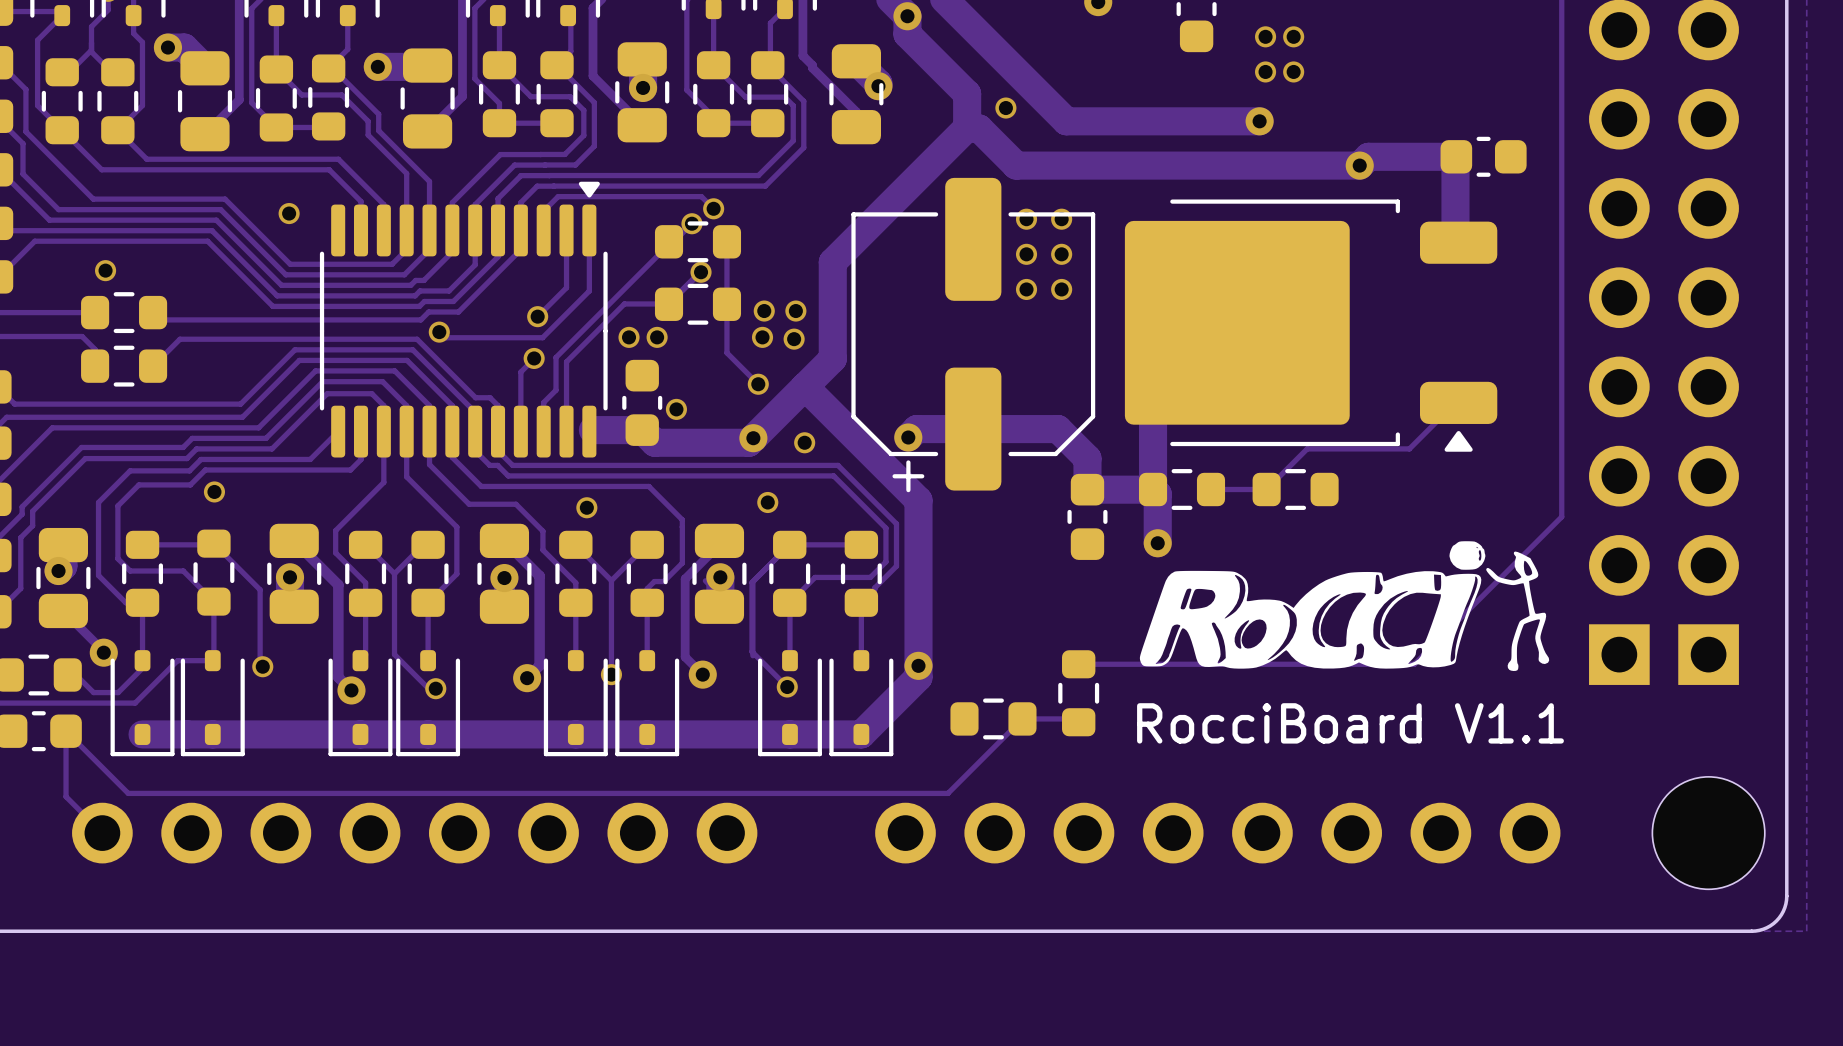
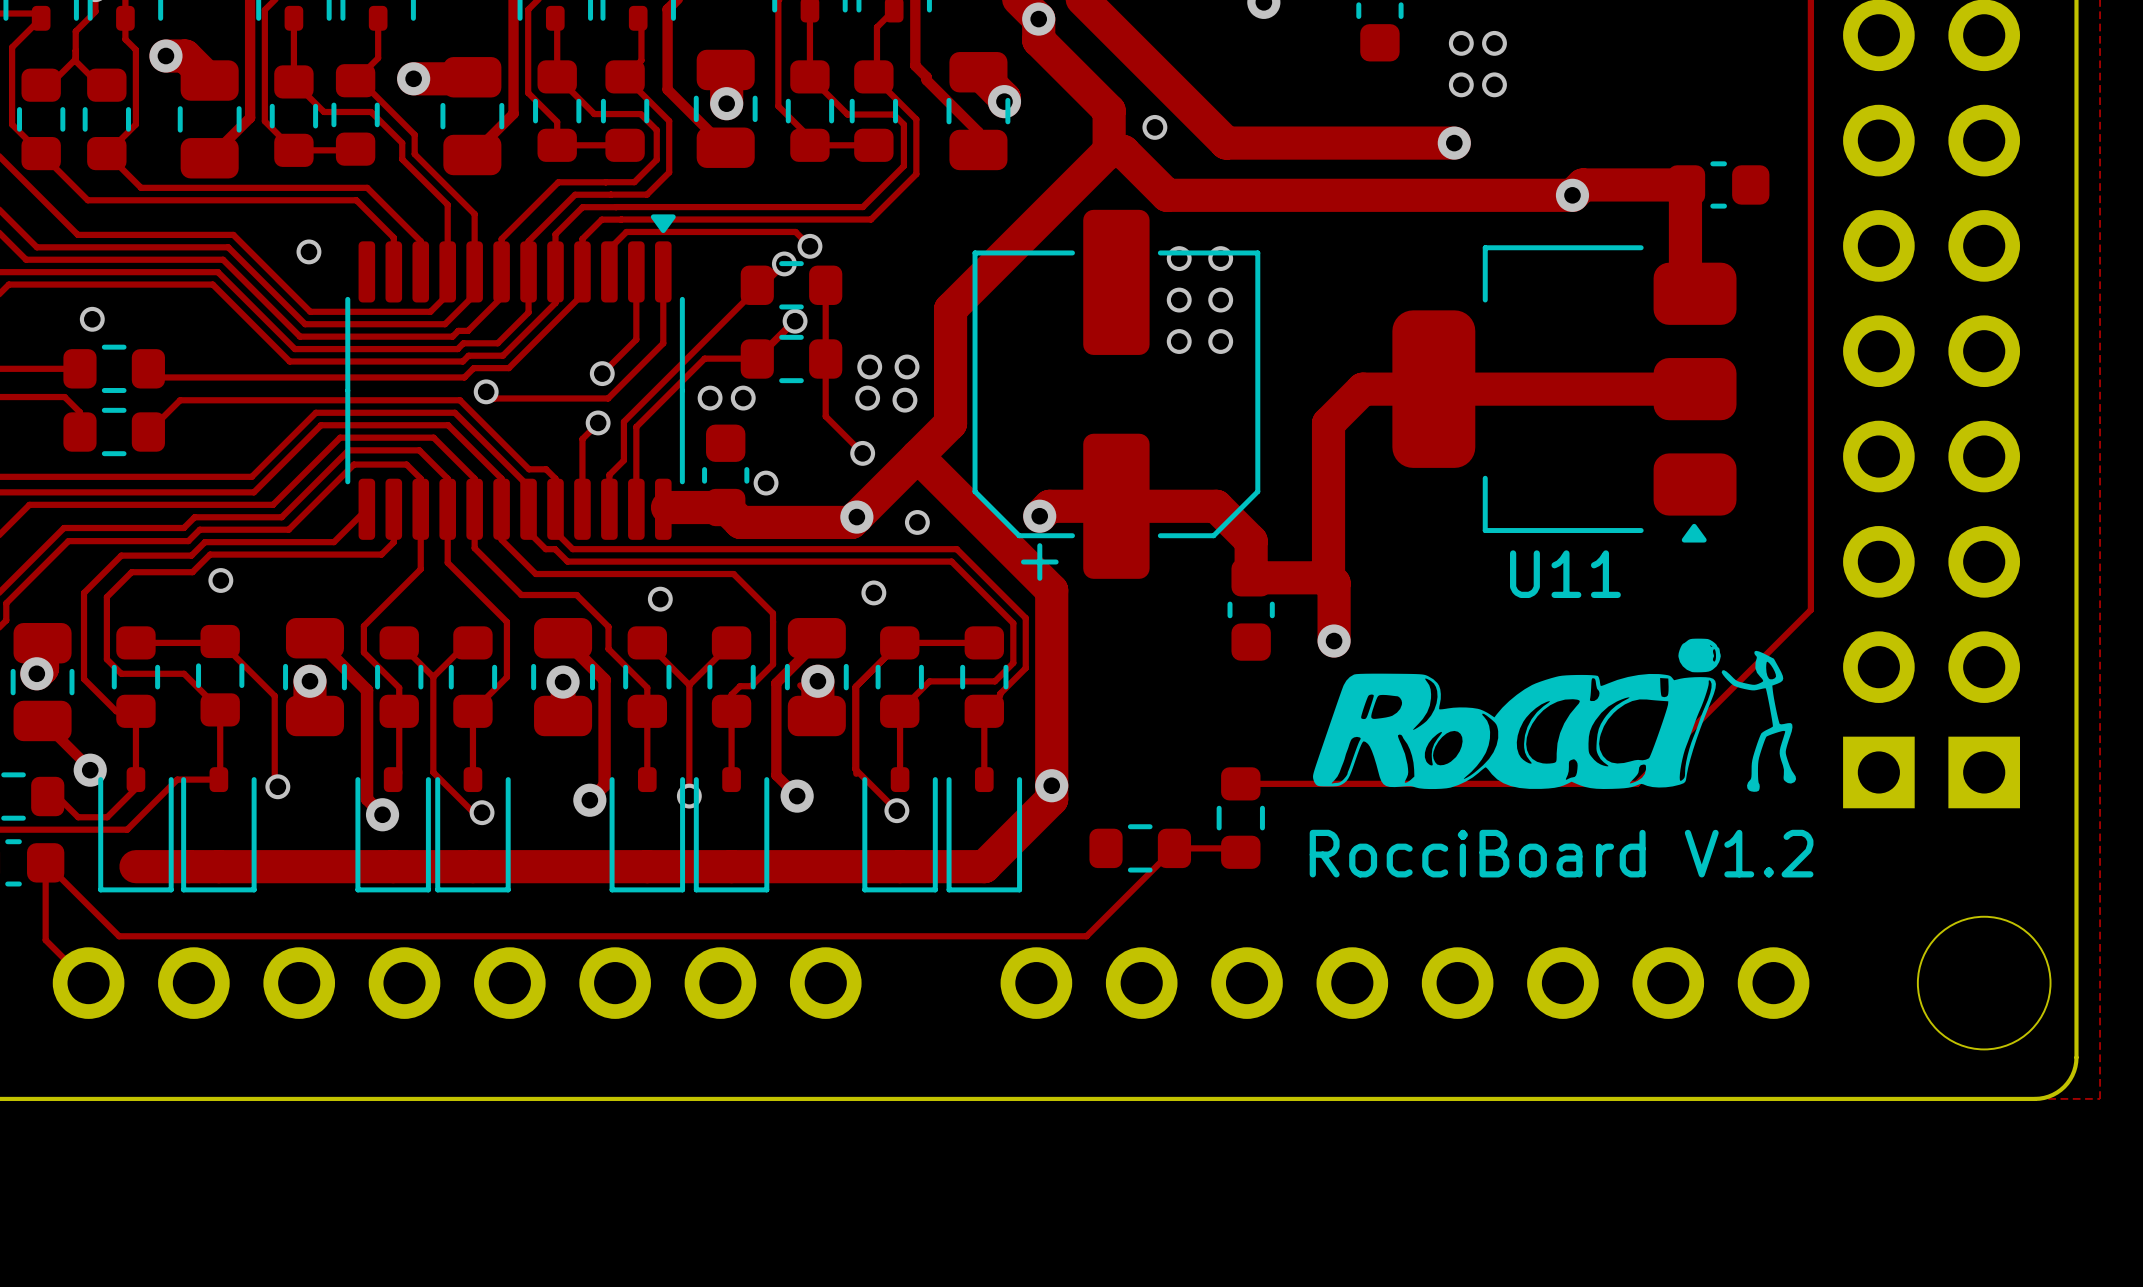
part: (1311, 325) -> none
track: none -> (1695, 389) (1362, 389) (1328, 423) (1328, 476)
U11: none -> (1564, 393)
track: (1455, 402) (1409, 448) (1307, 448) (1266, 489) (1210, 489) -> none
part: (1182, 489) -> none
part: (1295, 489) -> none
text: RocciBoard V1.1 (1350, 723) -> RocciBoard V1.2 (1561, 853)

